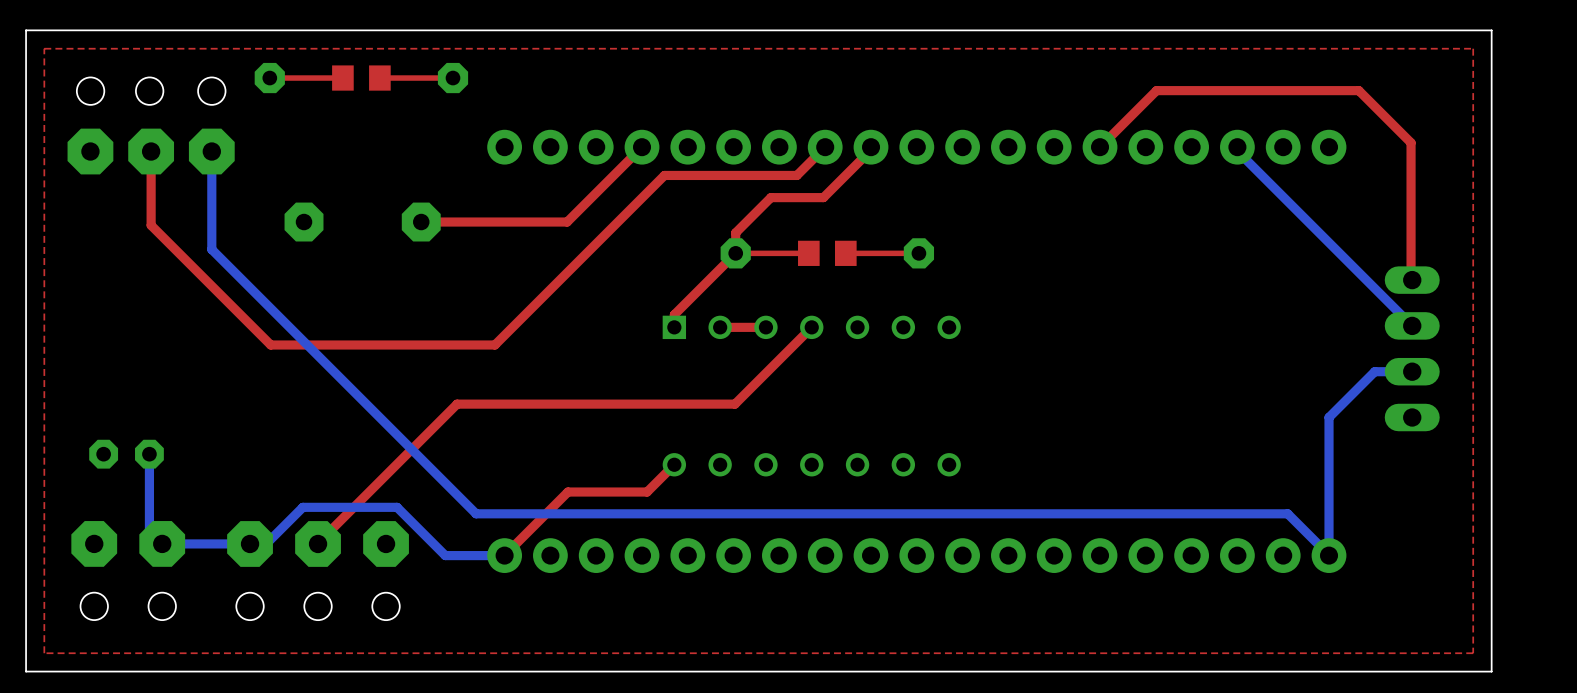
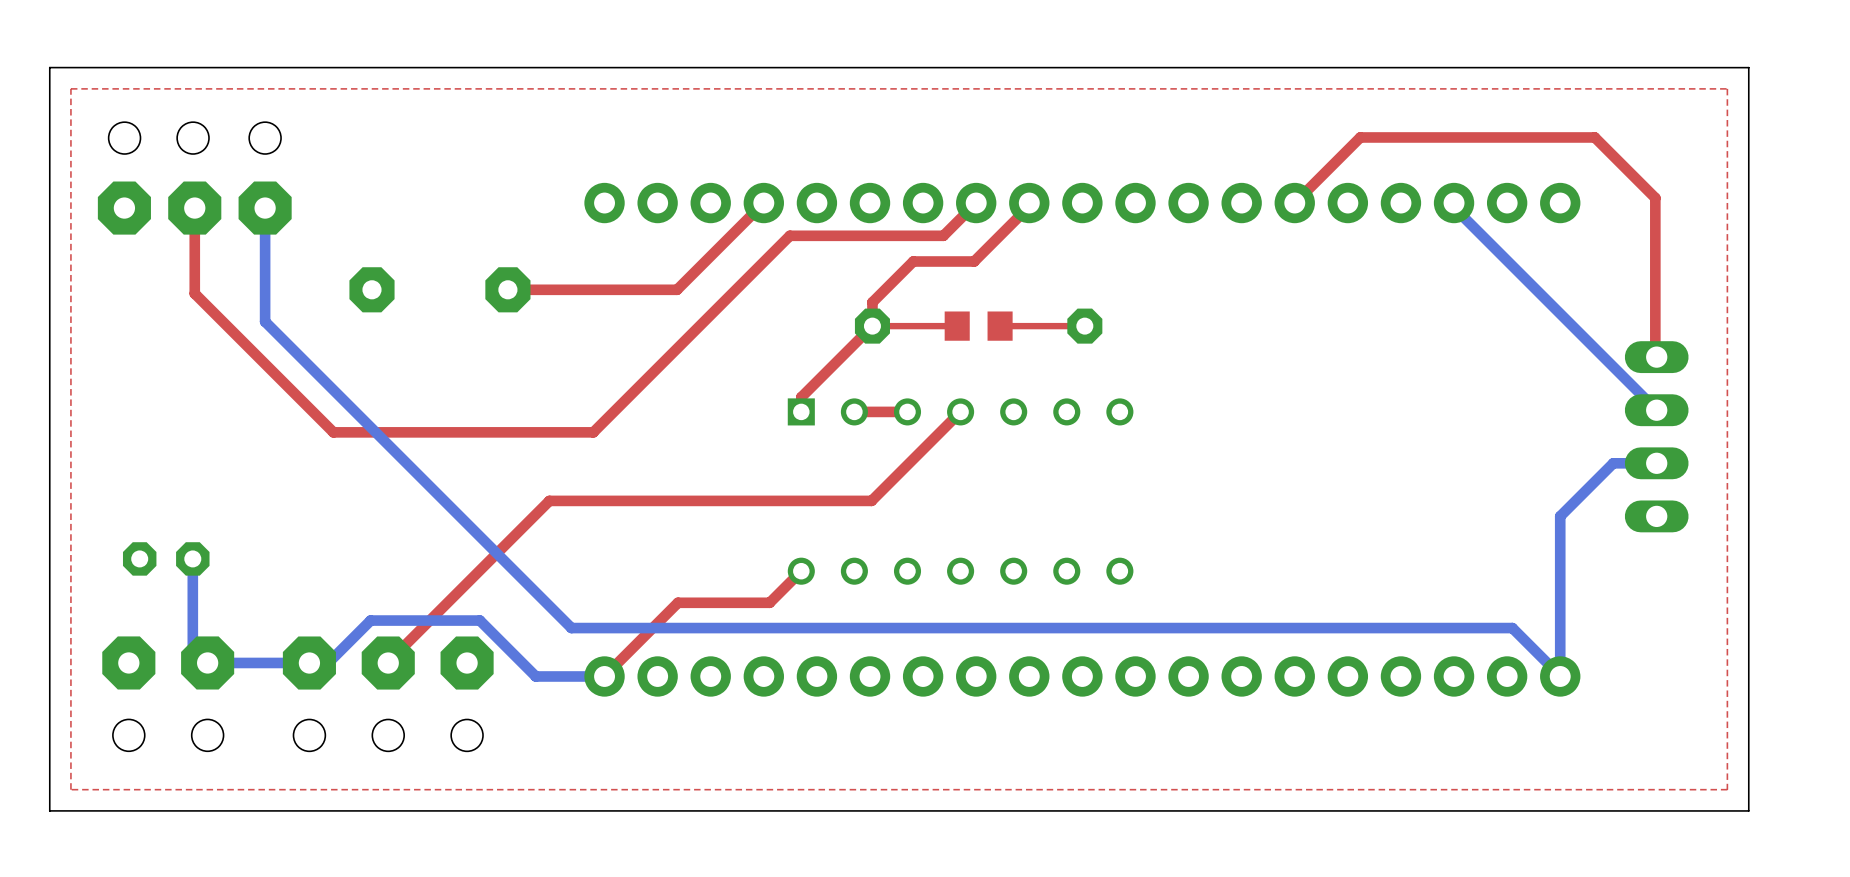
part: (361, 78) -> none

